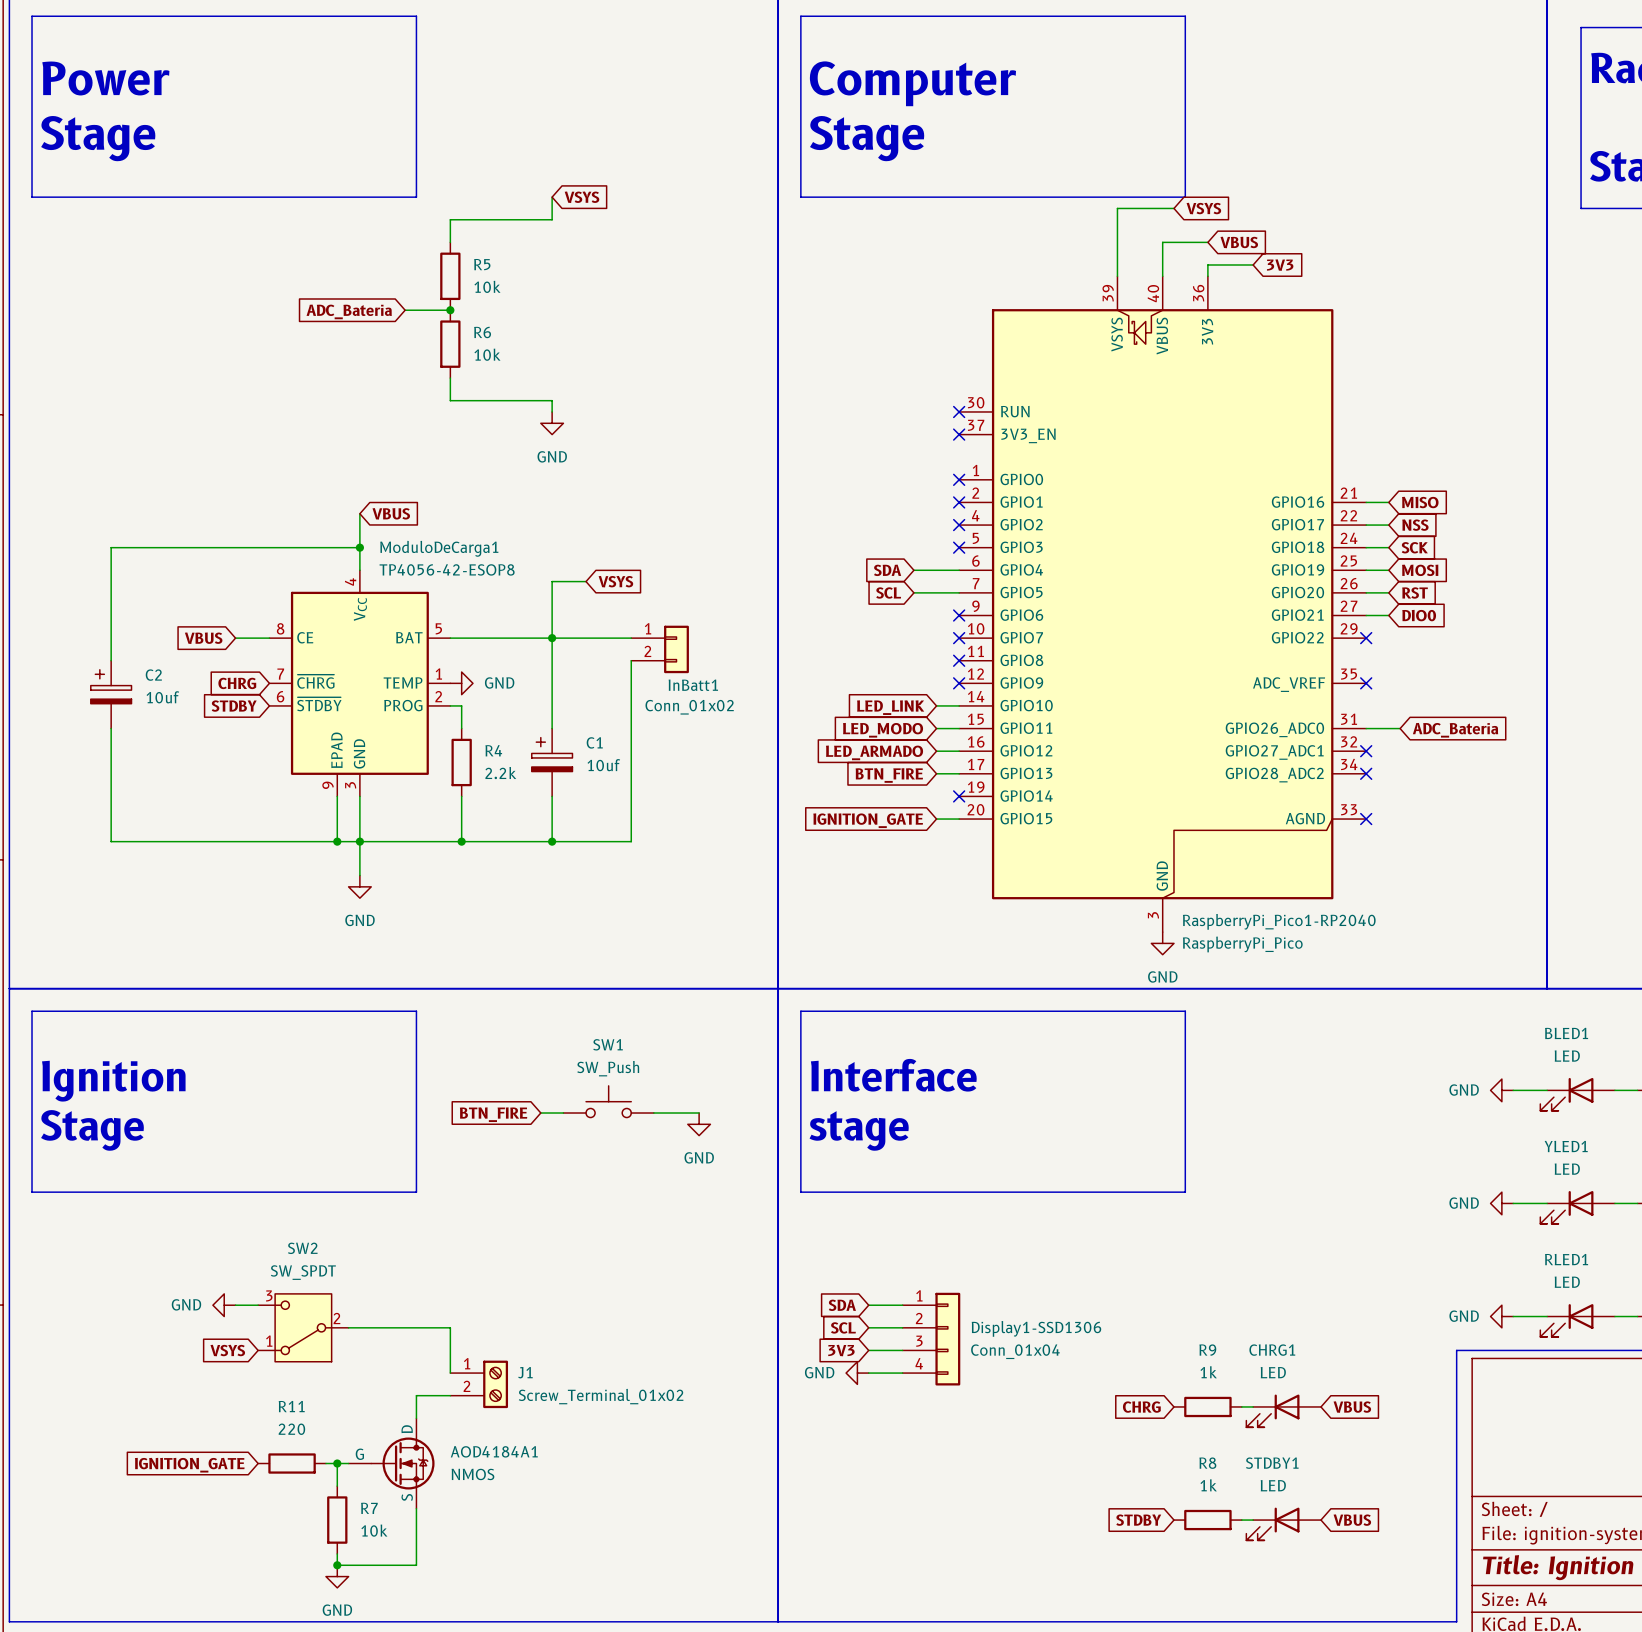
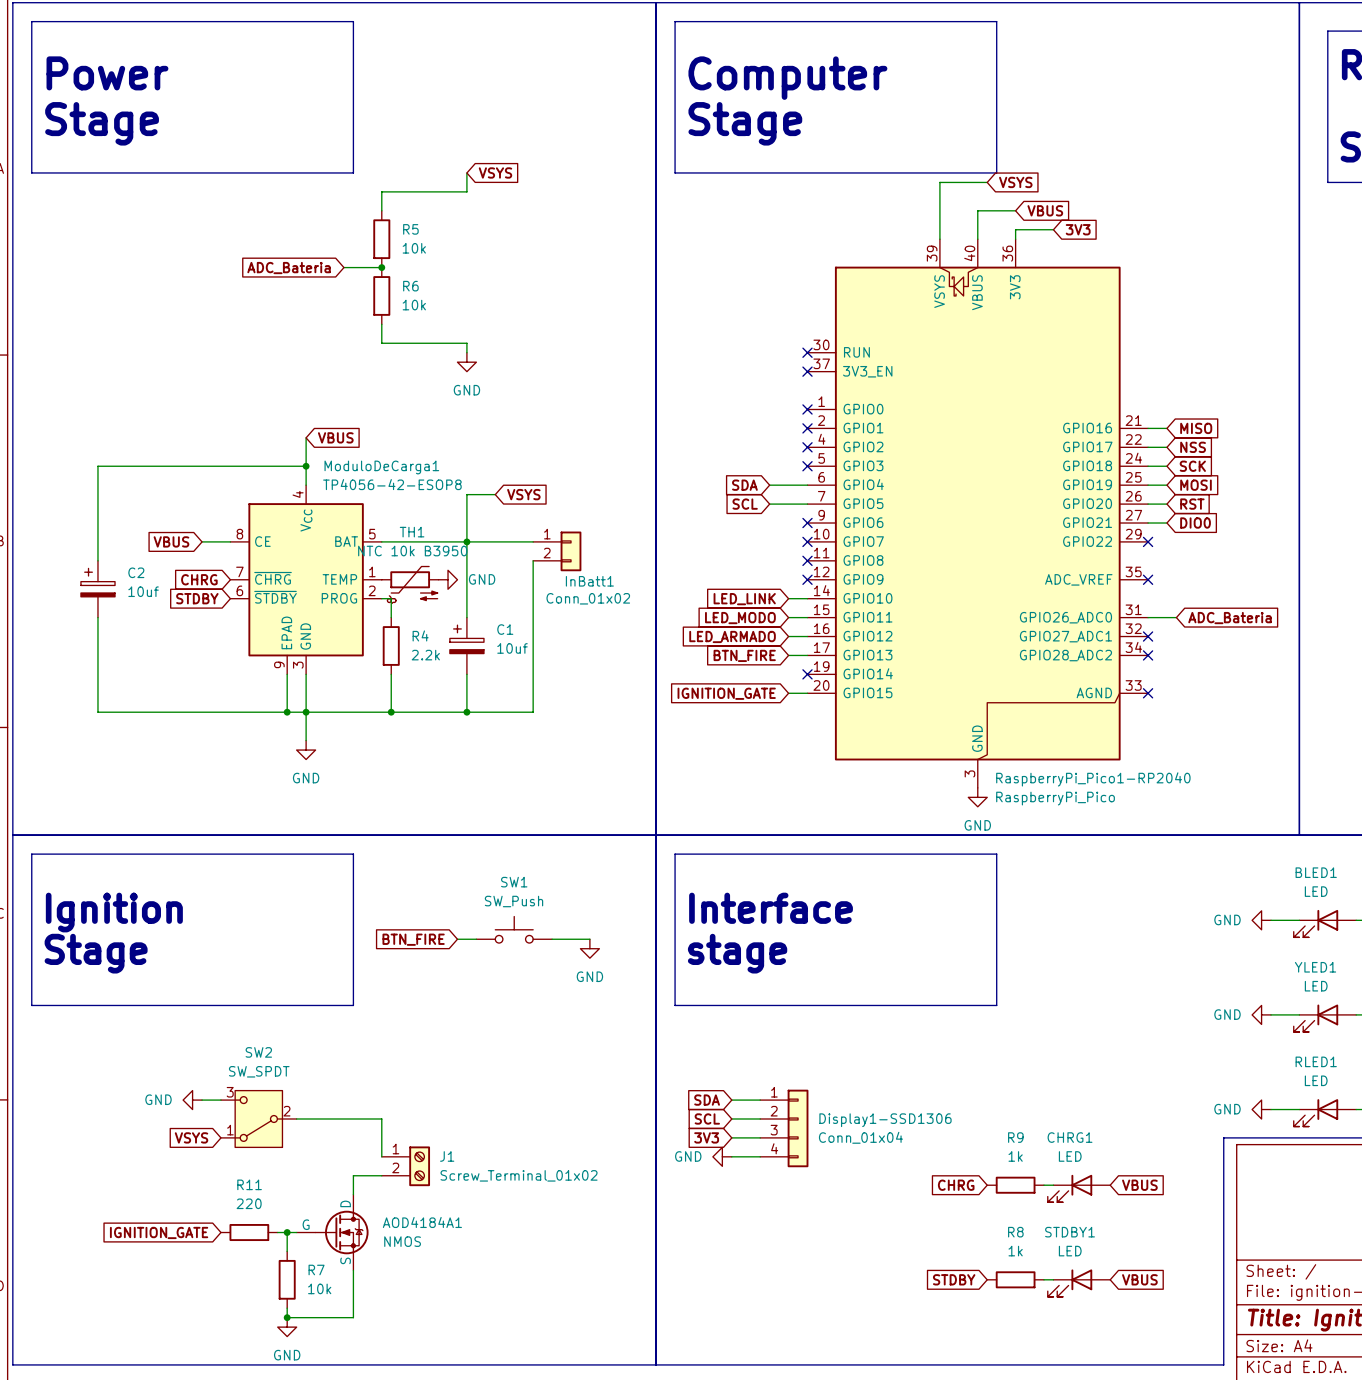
power symbol position: GND (461, 683) -> GND (448, 579)
TH1: none -> NTC 10k B3950 (410, 584)

